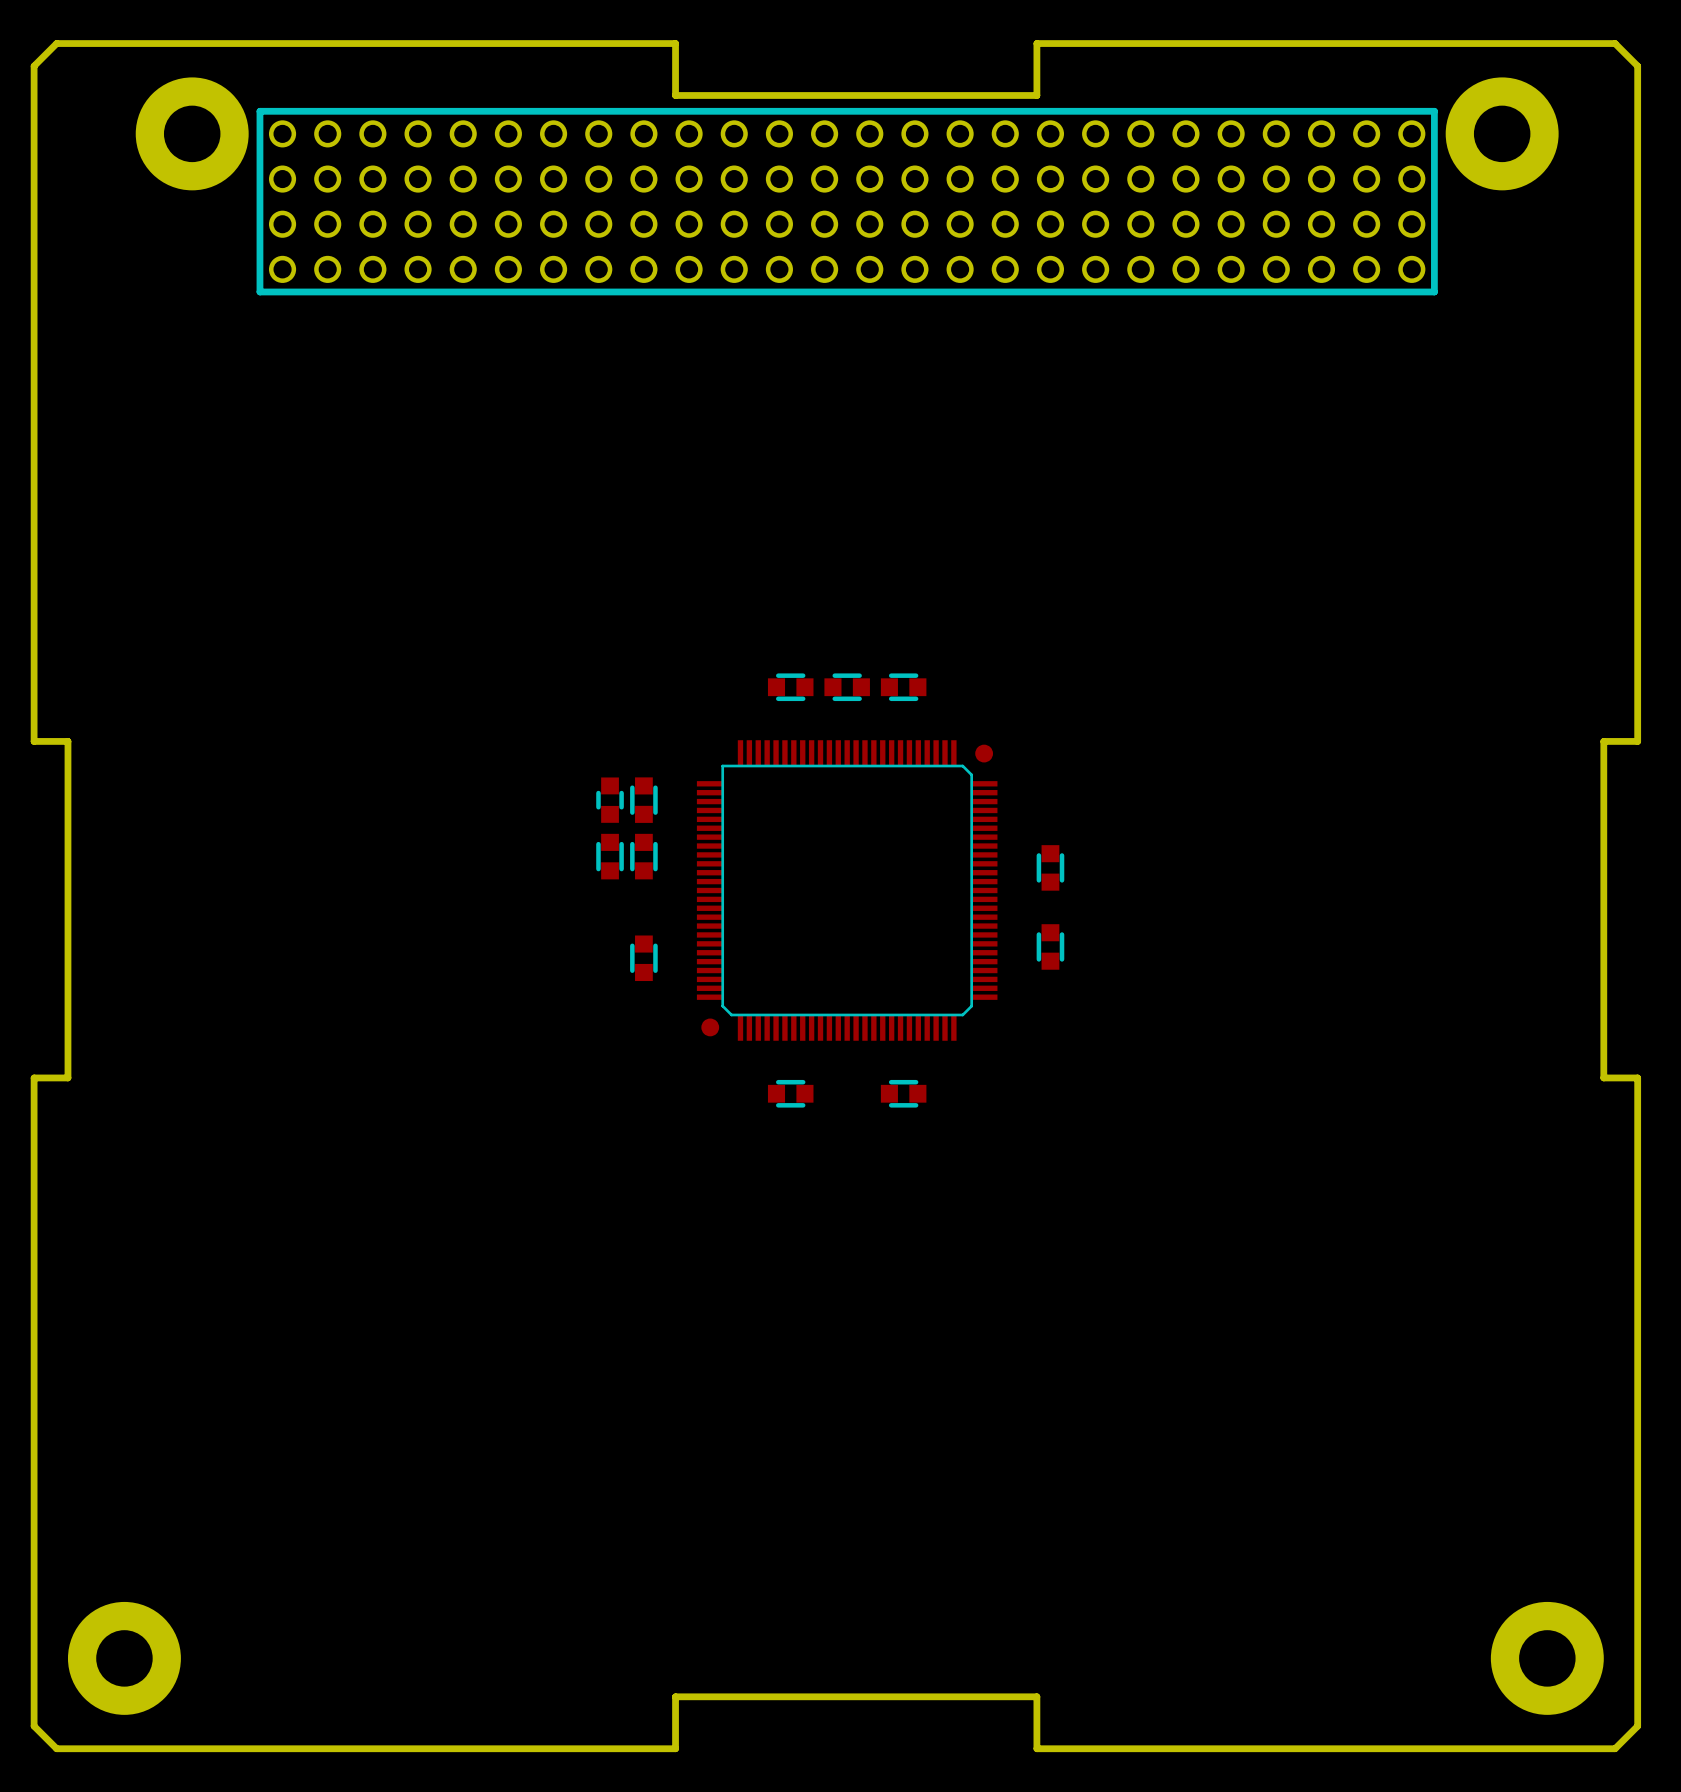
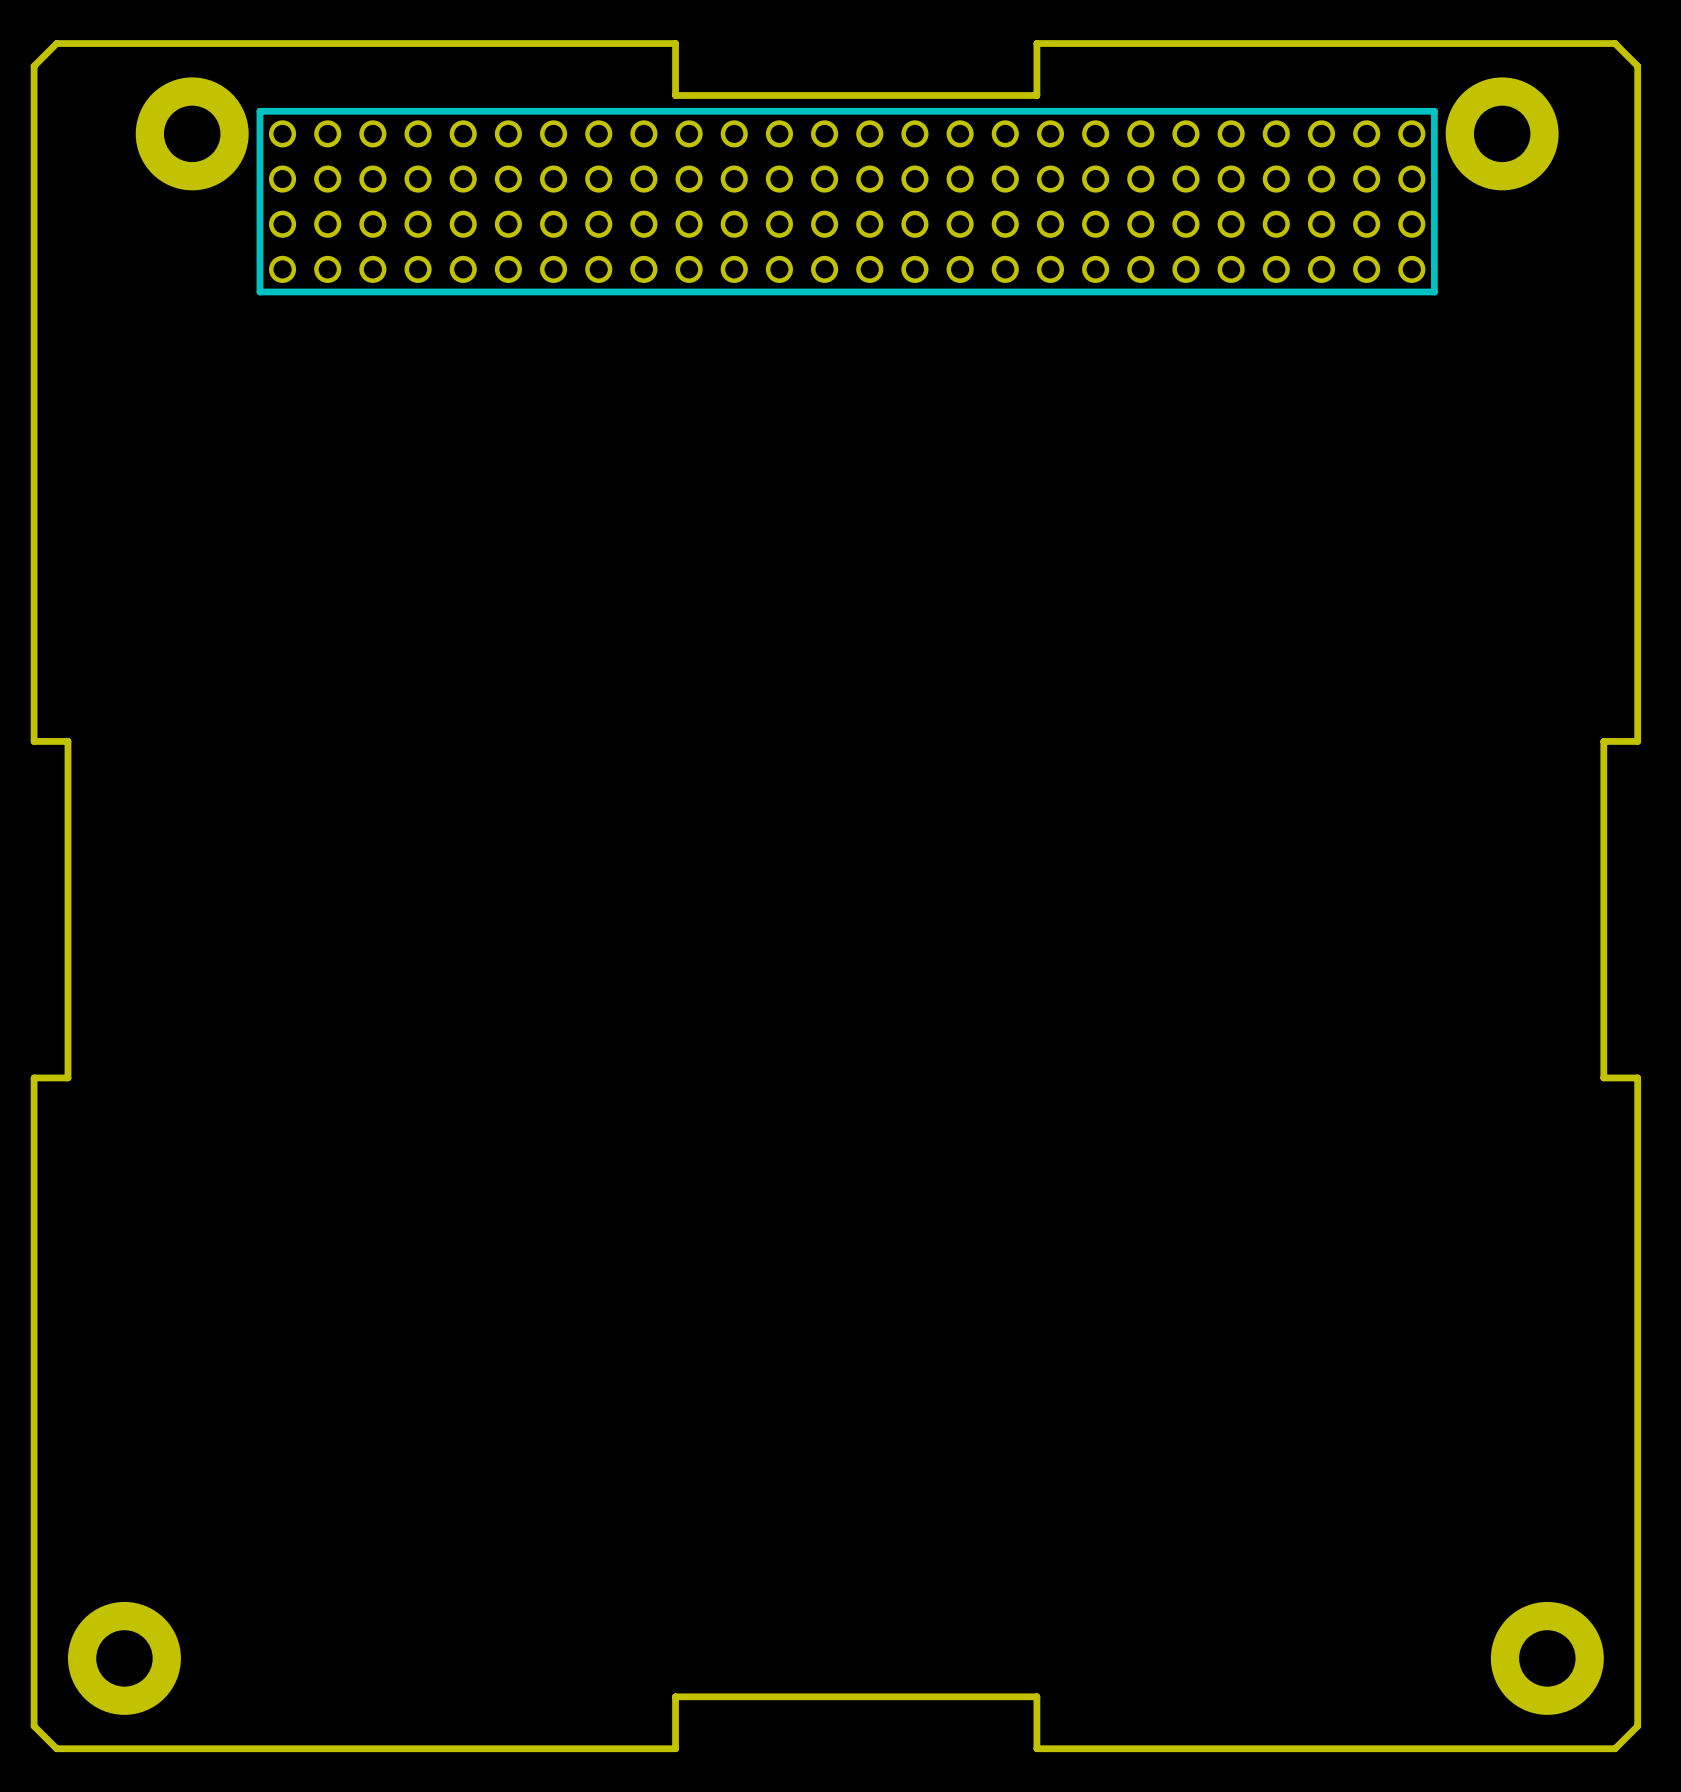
part: (790, 687) -> none
part: (847, 687) -> none
part: (903, 687) -> none
part: (610, 800) -> none
part: (643, 800) -> none
part: (610, 856) -> none
part: (643, 856) -> none
part: (1050, 867) -> none
part: (847, 890) -> none
part: (1050, 946) -> none
part: (643, 958) -> none
part: (790, 1093) -> none
part: (903, 1093) -> none

